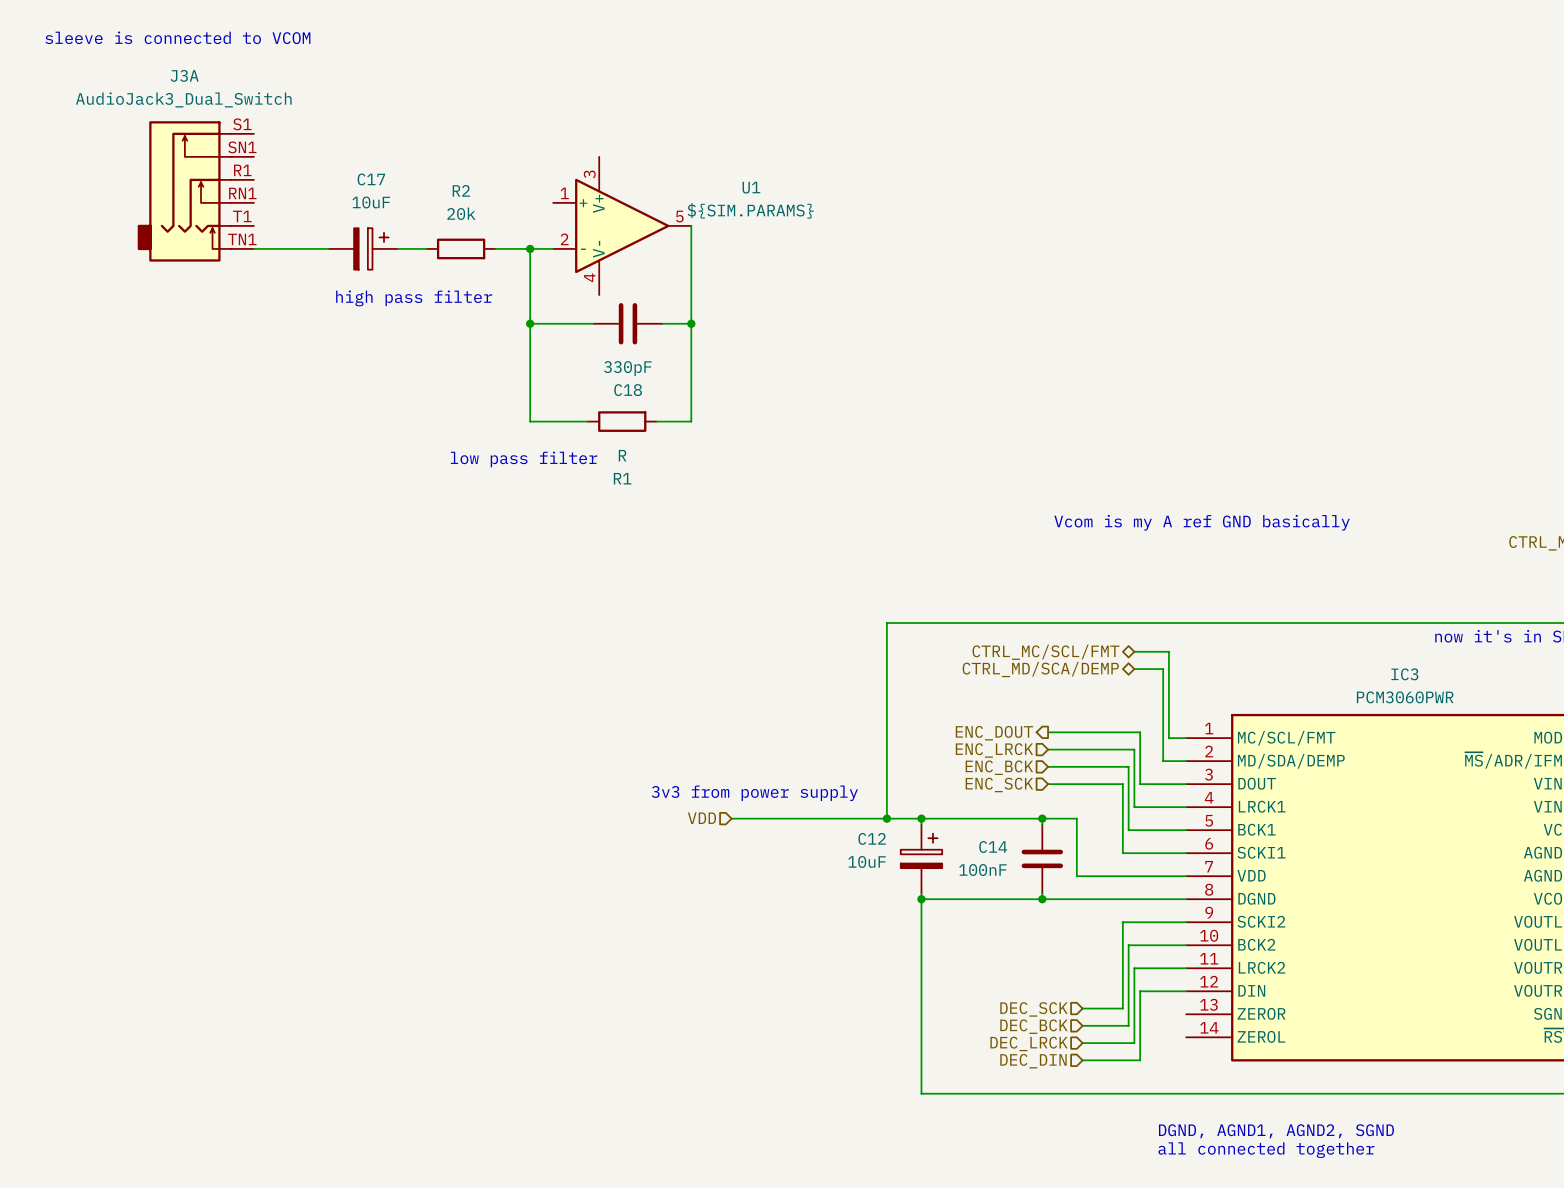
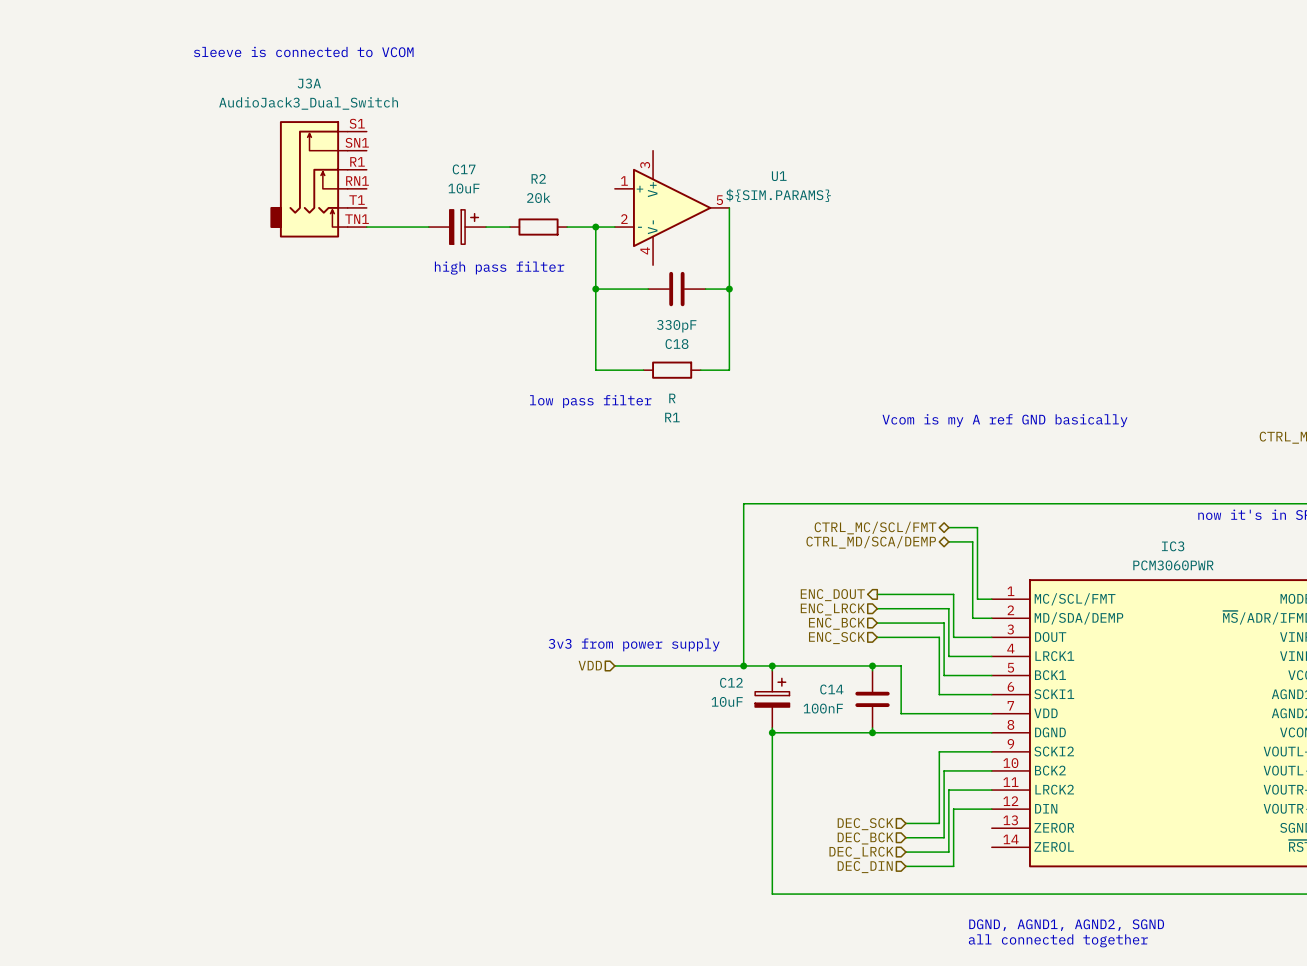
text position: sleeve is connected to VCOM (177, 37) -> sleeve is connected to VCOM (303, 51)
J3A position: (195, 191) -> (318, 179)
U1 position: (622, 225) -> (672, 207)
wire: (691, 225) (691, 421) (656, 421) -> (729, 207) (729, 370) (700, 370)
wire: (253, 248) (328, 248) -> (366, 227) (428, 227)
C17 position: (363, 248) -> (457, 227)
wire: (397, 248) (426, 248) -> (486, 227) (509, 227)
R2 position: (461, 248) -> (538, 227)
wire: (495, 248) (553, 248) -> (567, 227) (614, 227)
wire: (530, 248) (530, 421) (587, 421) -> (595, 227) (595, 370) (643, 370)
junction: (530, 248) -> none
junction: none -> (595, 227)
text position: high pass filter (414, 298) -> high pass filter (499, 268)
wire: (530, 323) (593, 323) -> (595, 289) (648, 289)
junction: (530, 323) -> none
C18 position: (627, 323) -> (676, 289)
wire: (662, 323) (691, 323) -> (705, 289) (729, 289)
junction: (691, 323) -> none
junction: none -> (595, 289)
junction: none -> (729, 289)
R1 position: (622, 421) -> (672, 370)
text position: low pass filter (524, 459) -> low pass filter (590, 401)

